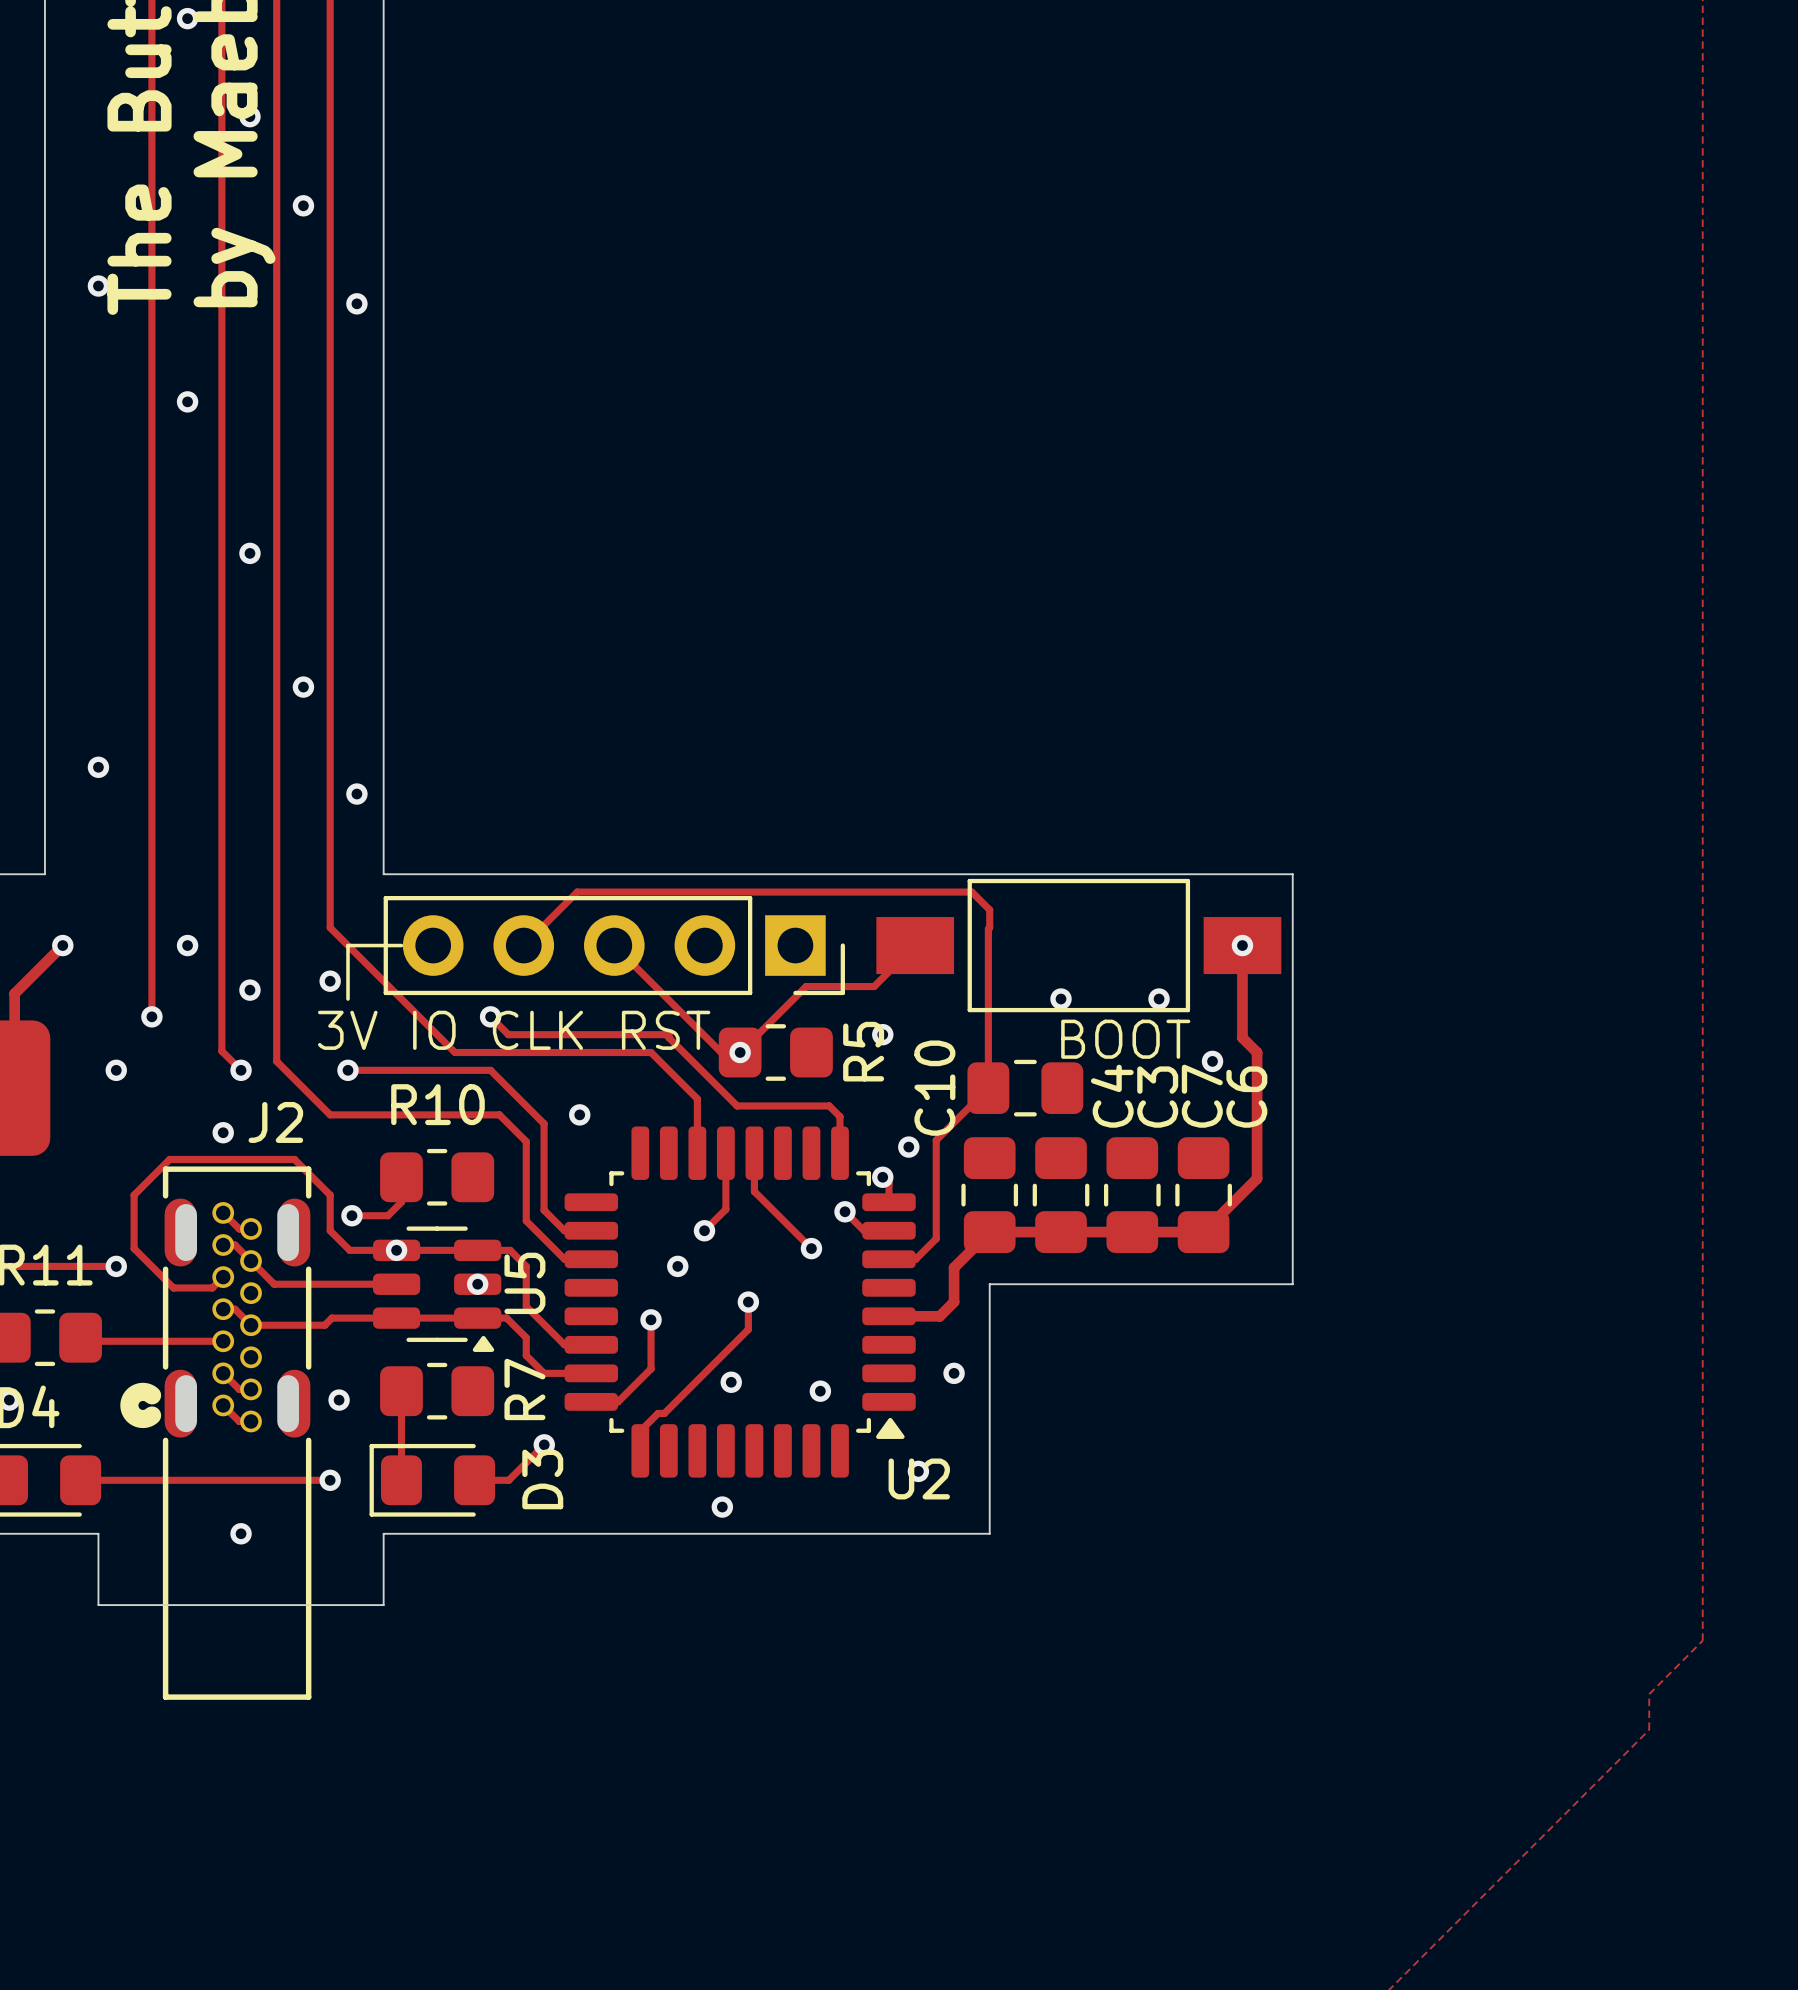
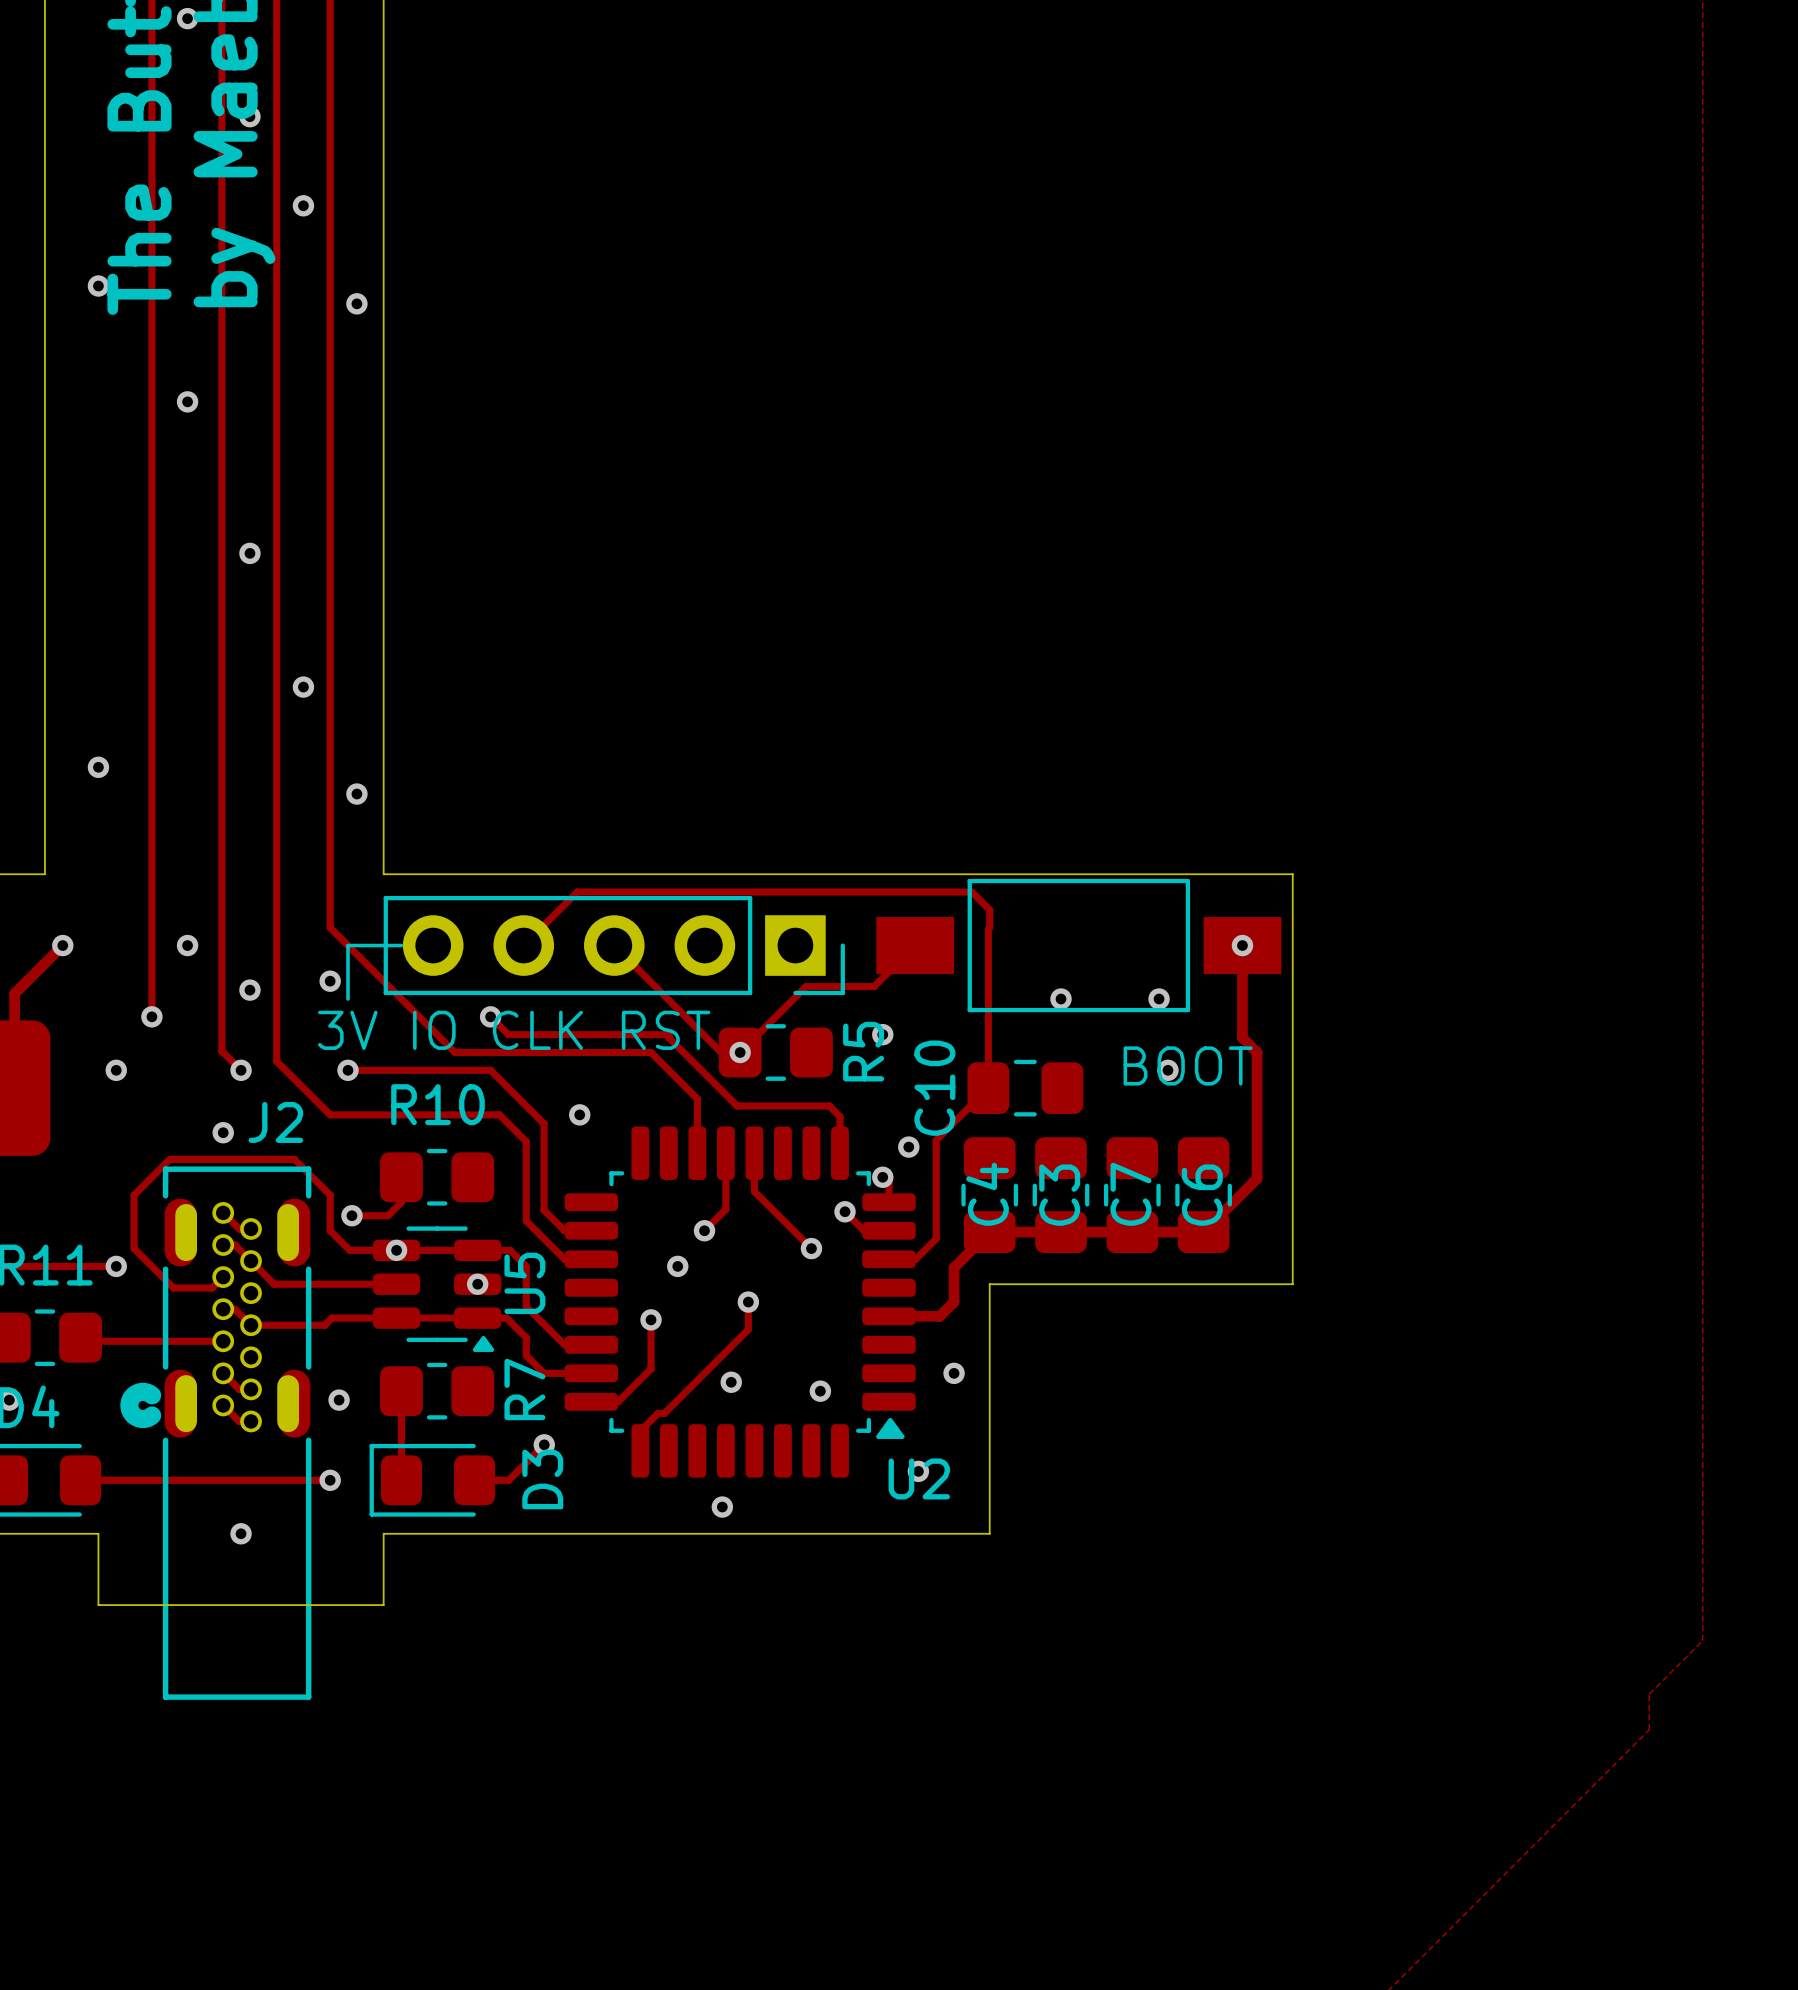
text position: BOOT (1125, 1039) -> BOOT (1188, 1065)
via position: (1212, 1061) -> (1167, 1070)
C4 name position: C4 (1112, 1096) -> C4 (987, 1194)
C7 name position: C7 (1202, 1096) -> C7 (1130, 1194)
C3 name position: C3 (1157, 1097) -> C3 (1059, 1195)
C6 name position: C6 (1246, 1097) -> C6 (1202, 1195)

